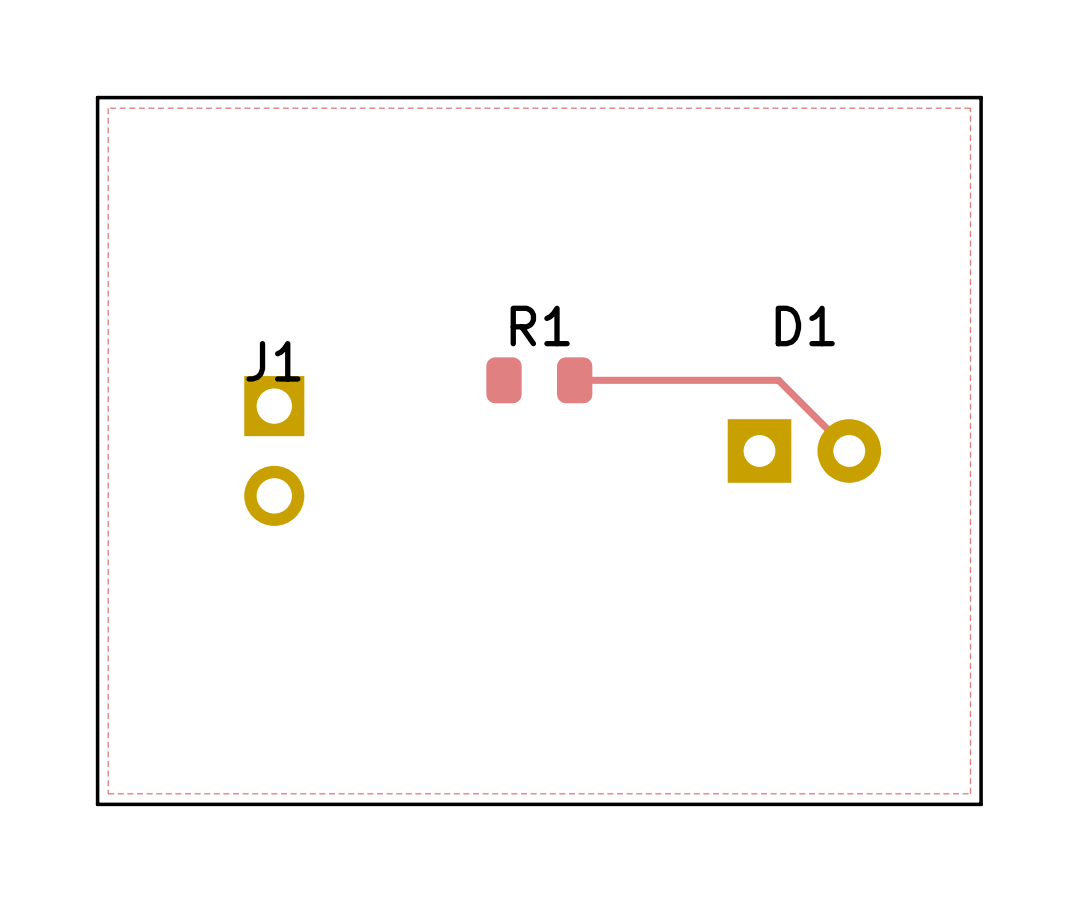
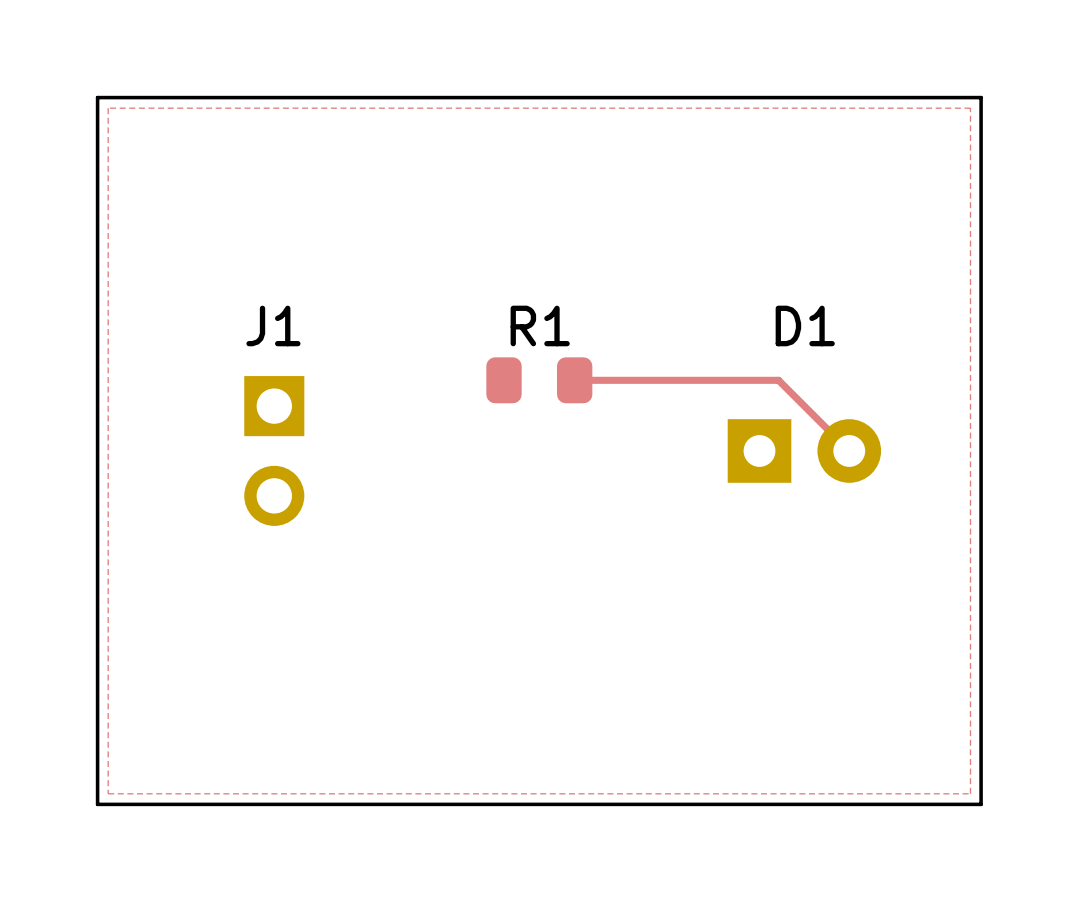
J1 name position: J1 (273, 361) -> J1 (273, 325)

